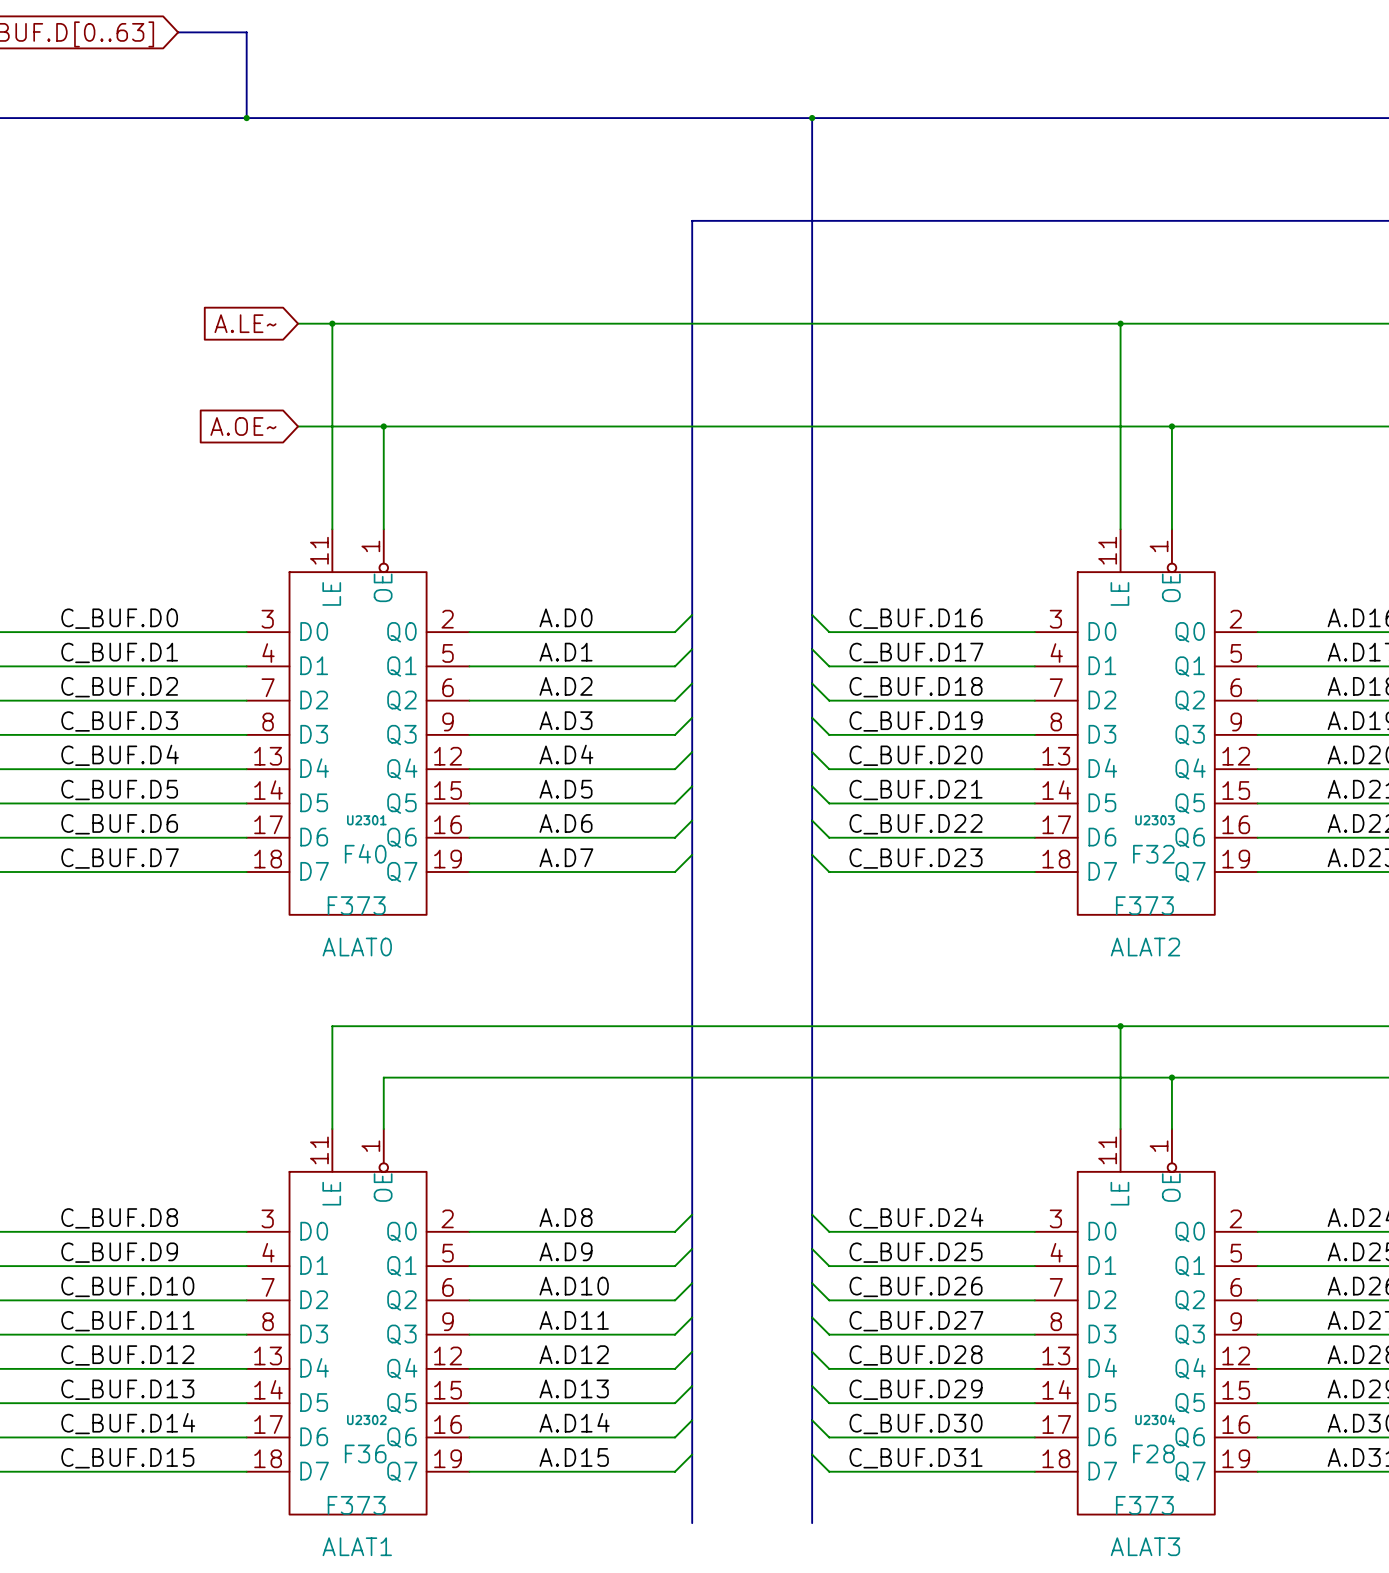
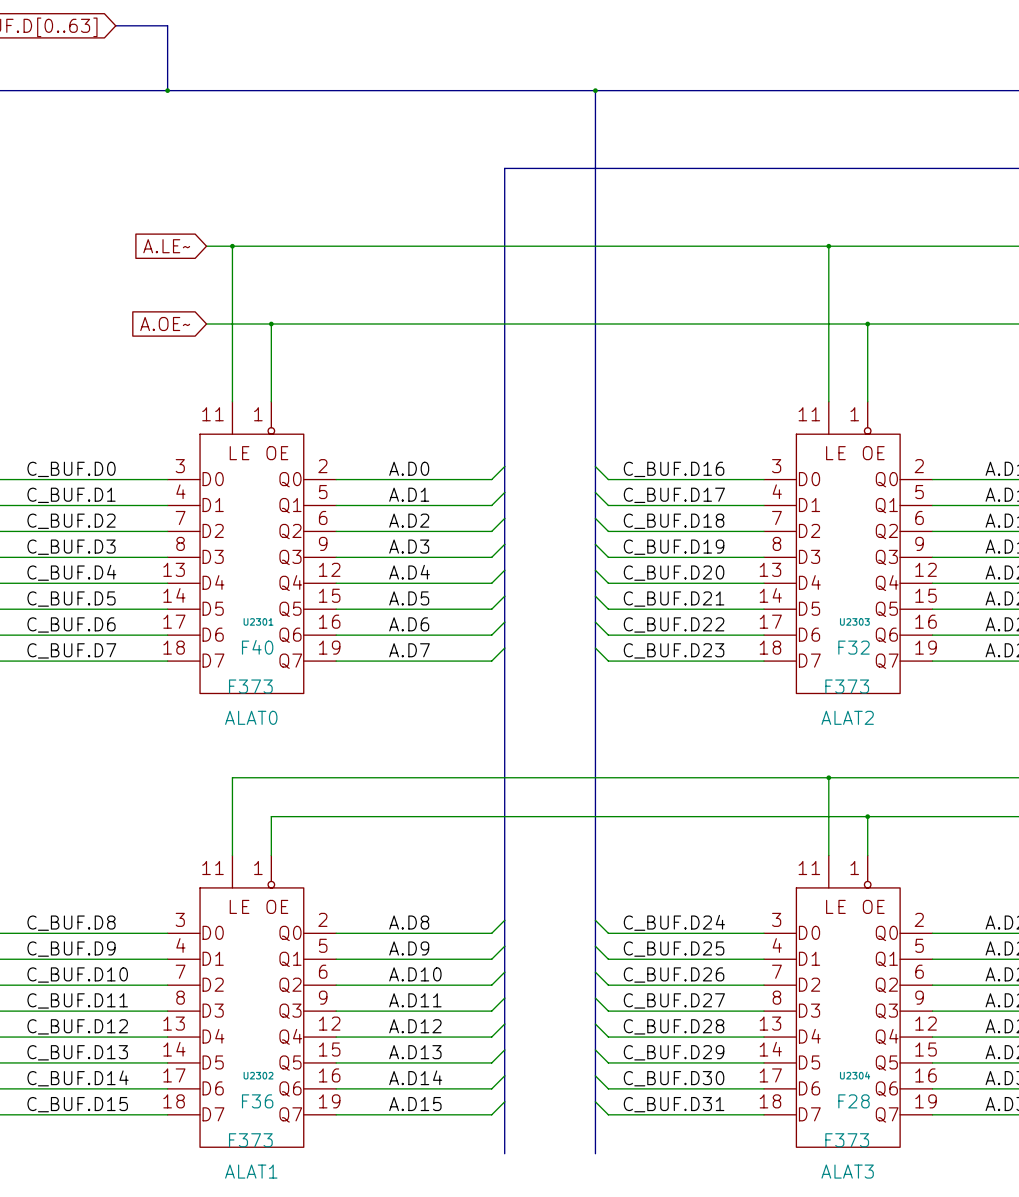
U2301 symbol: [246, 529, 470, 915] -> [167, 401, 337, 694]
U2303 symbol: [1034, 529, 1258, 915] -> [763, 401, 933, 694]
U2302 symbol: [246, 1129, 470, 1515] -> [167, 855, 337, 1148]
U2304 symbol: [1034, 1129, 1258, 1515] -> [763, 855, 933, 1148]

